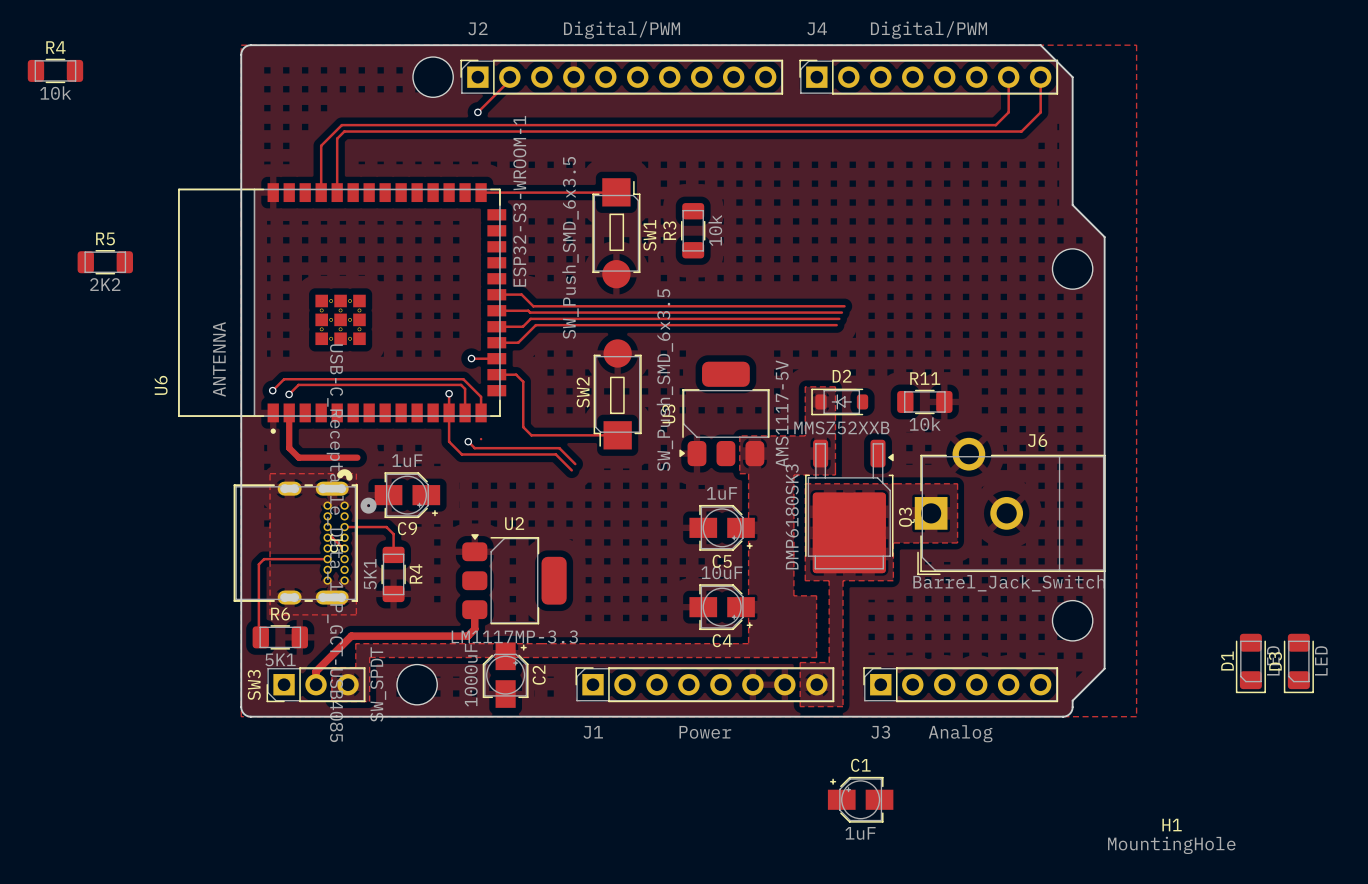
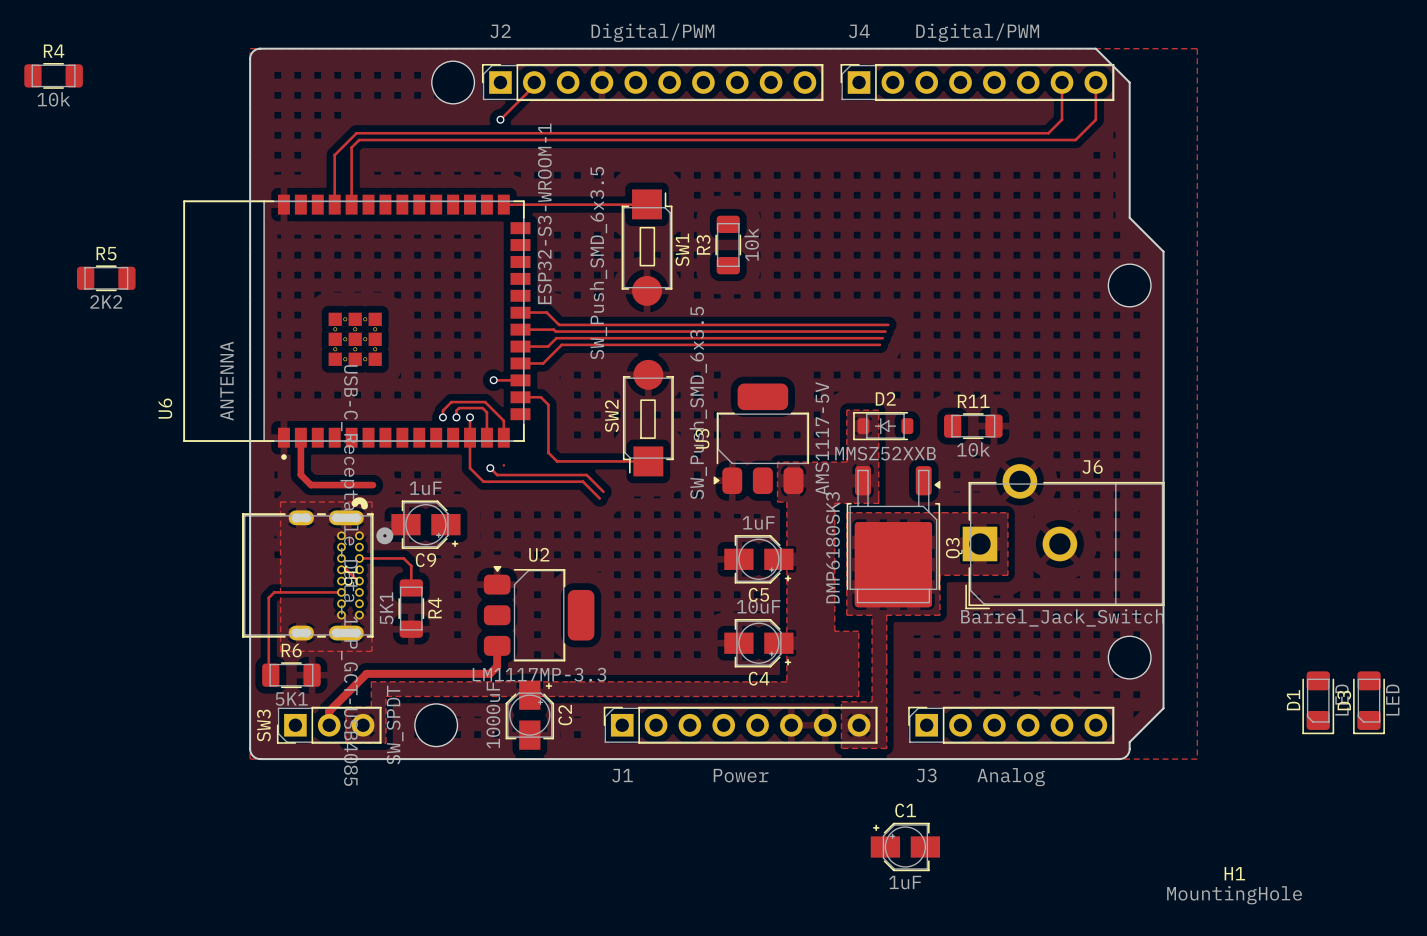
track: (431, 379) (284, 379) (272, 390) -> (451, 402) (442, 410) (442, 417)
track: (438, 384) (298, 384) (289, 394) -> (459, 408) (456, 410) (456, 417)
via: (272, 390) -> none
via: none -> (442, 417)
via: none -> (456, 417)
via: (289, 394) -> none

